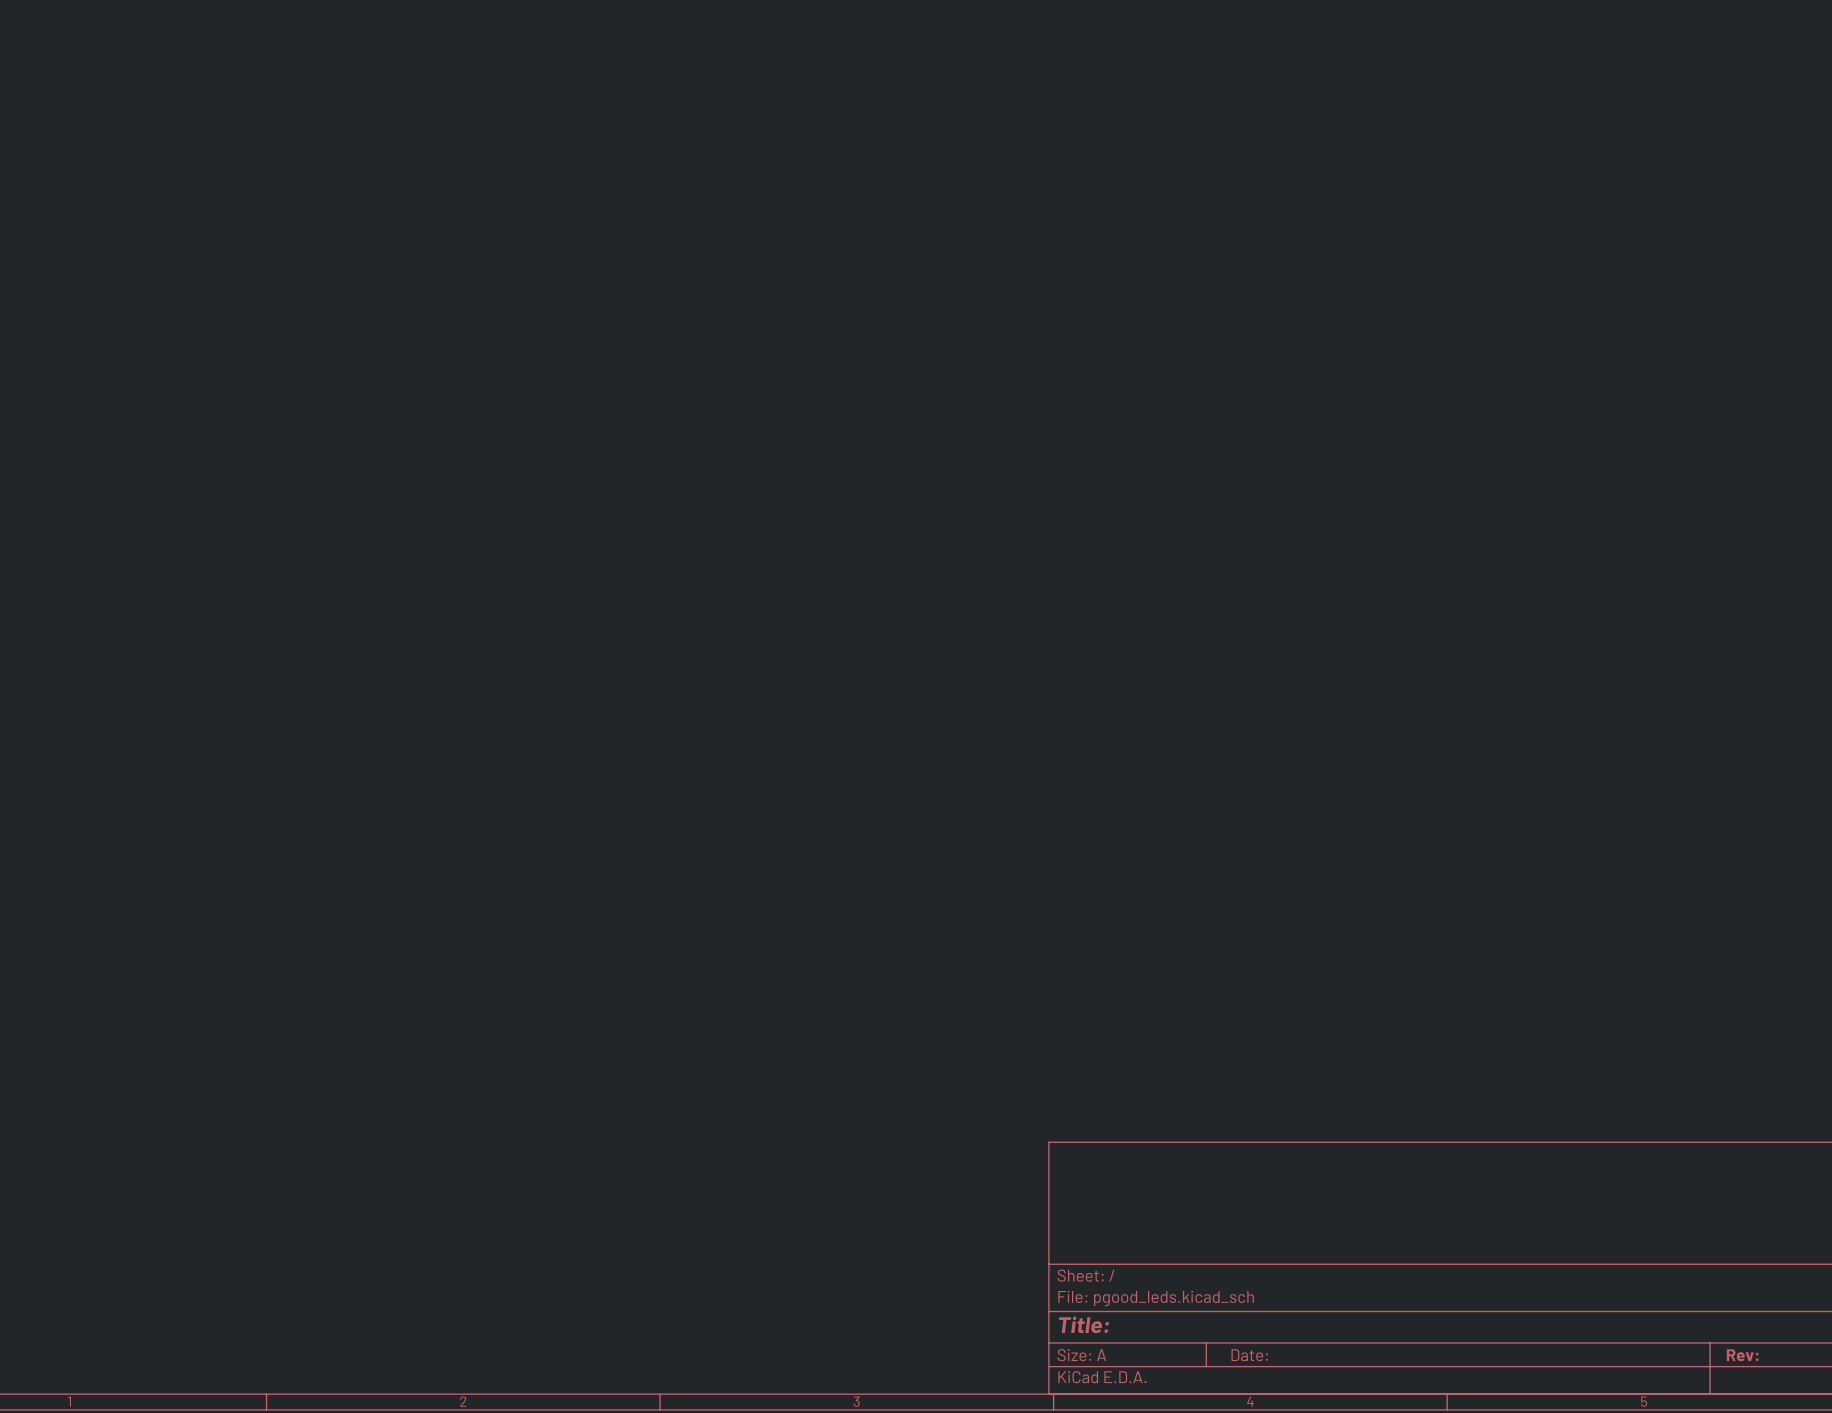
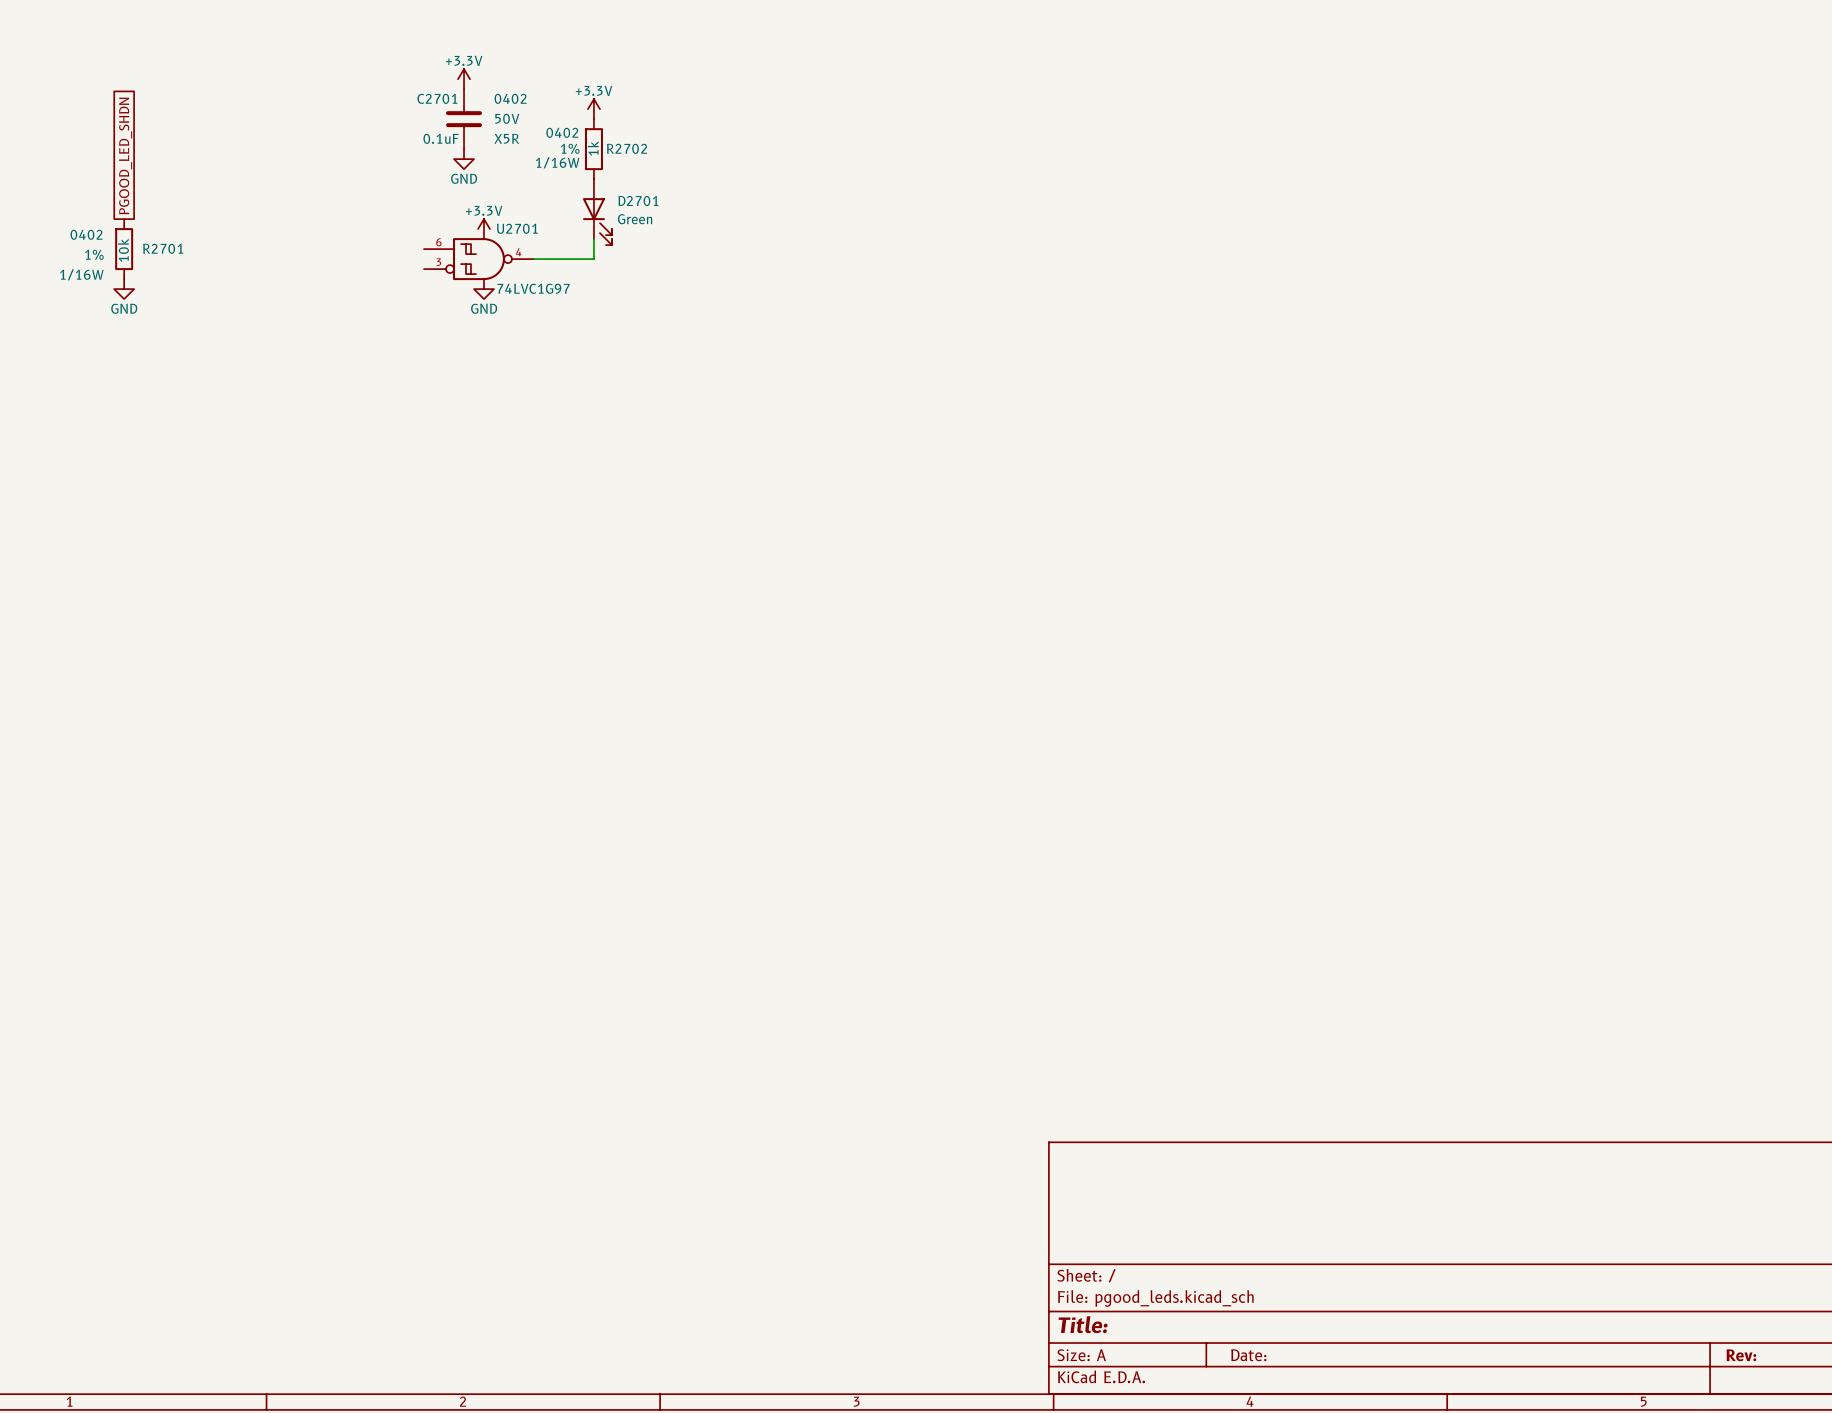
power symbol: none -> +3.3V (464, 79)
power symbol: none -> +3.3V (593, 109)
C2701: none -> 0.1uF (464, 119)
R2702: none -> 1k (593, 149)
global label: none -> PGOOD_LED_SHDN (125, 156)
power symbol: none -> GND (464, 159)
D2701: none -> Green (597, 212)
power symbol: none -> +3.3V (484, 229)
wire: none -> (593, 239) (593, 259) (533, 259)
R2701: none -> 10k (124, 249)
U2701: none -> 74LVC1G97 (479, 259)
power symbol: none -> GND (124, 289)
power symbol: none -> GND (484, 289)

